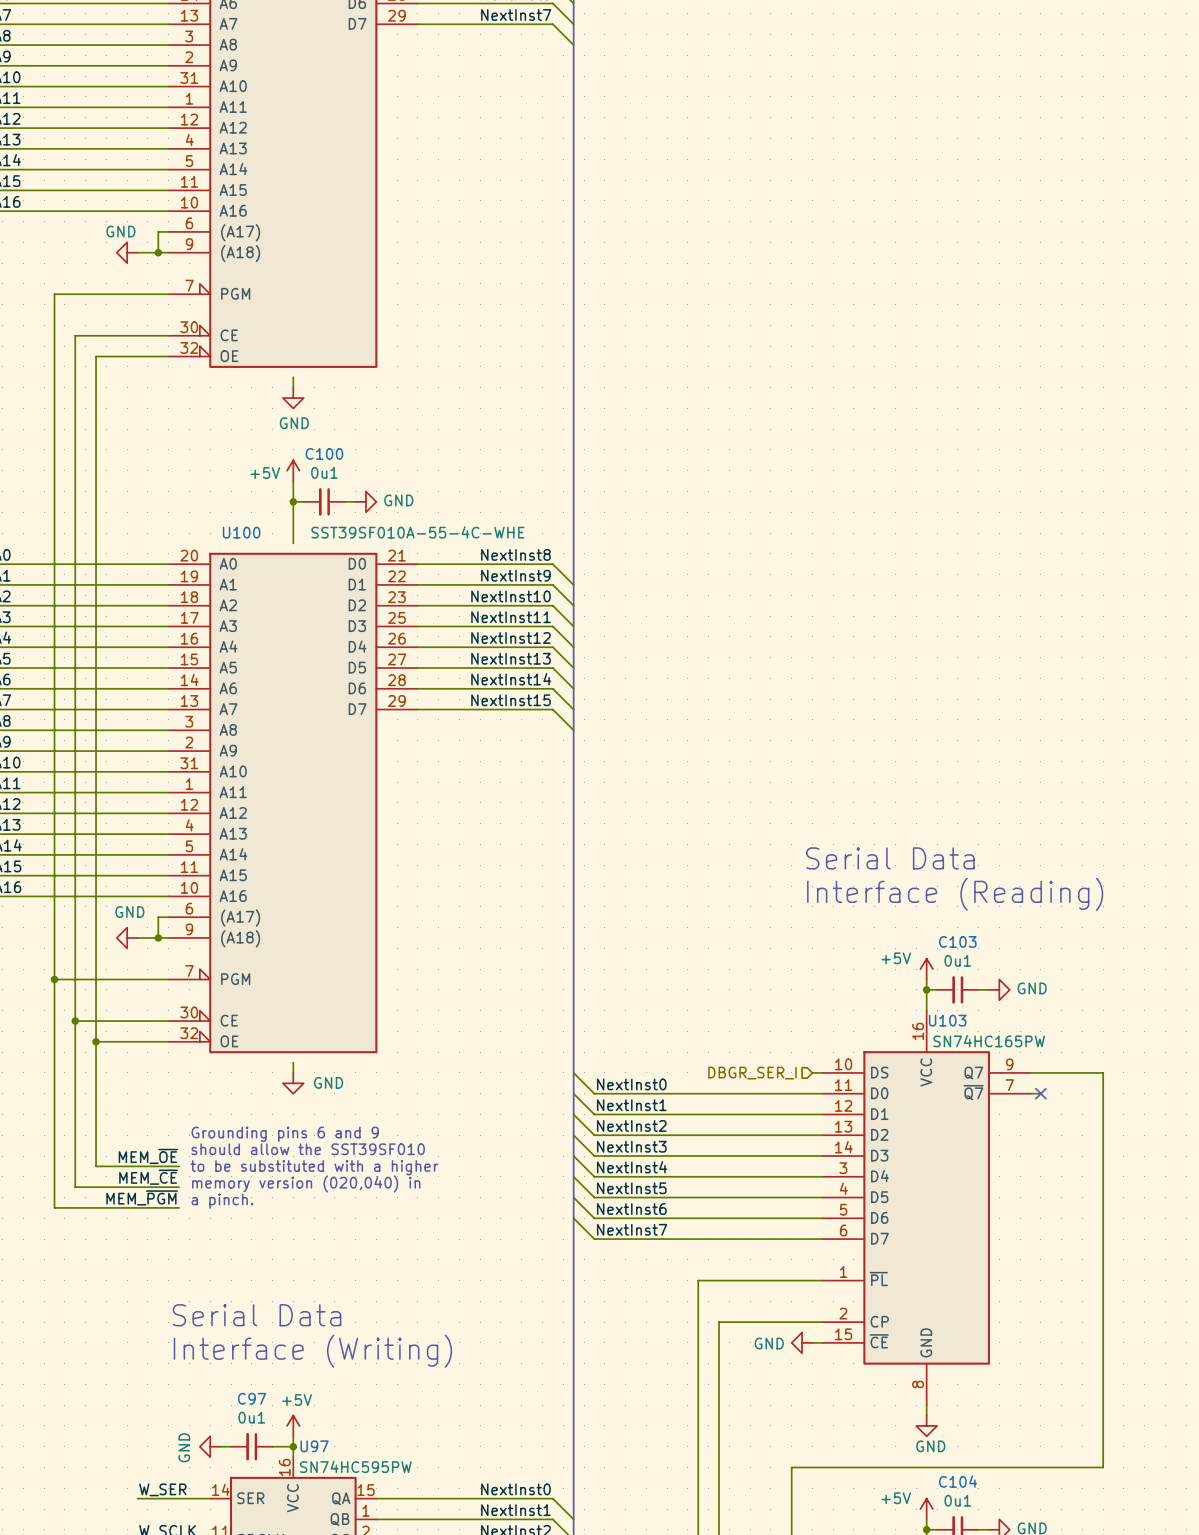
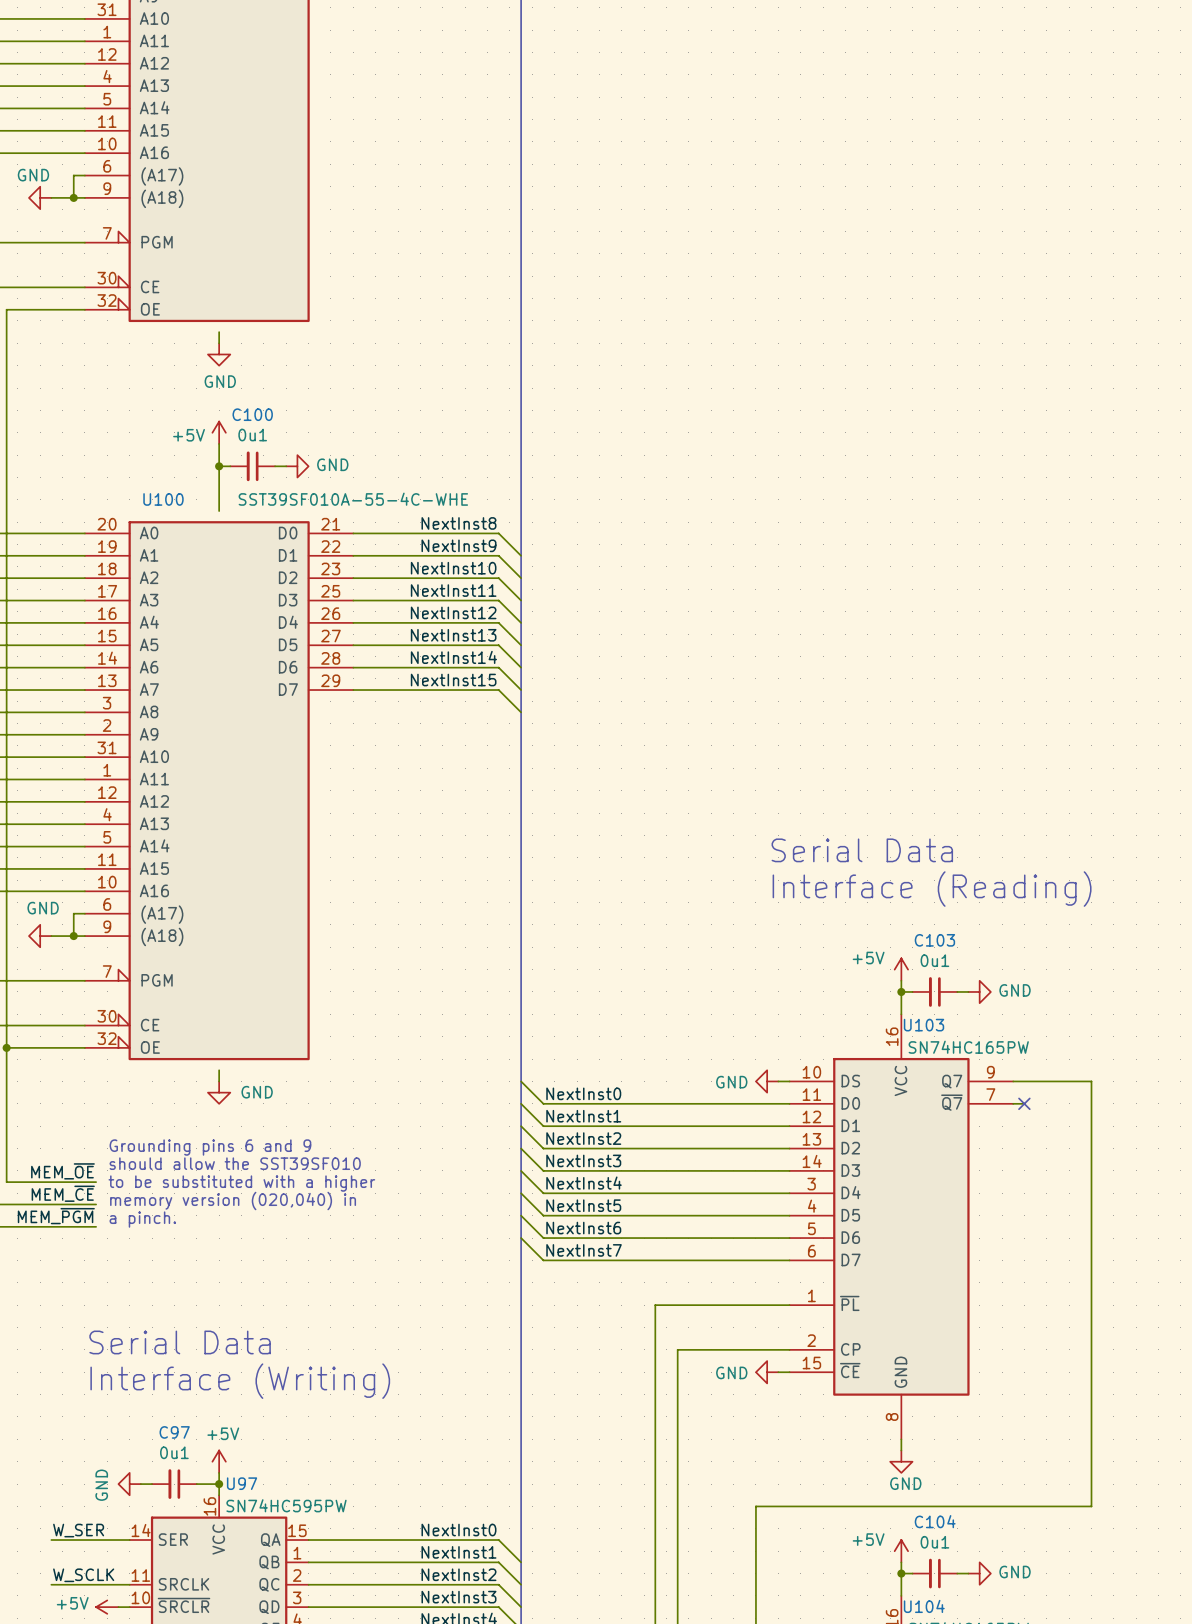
power symbol: none -> GND (767, 1081)
hierarchical label: DBGR_SER_I (752, 1073) -> none

